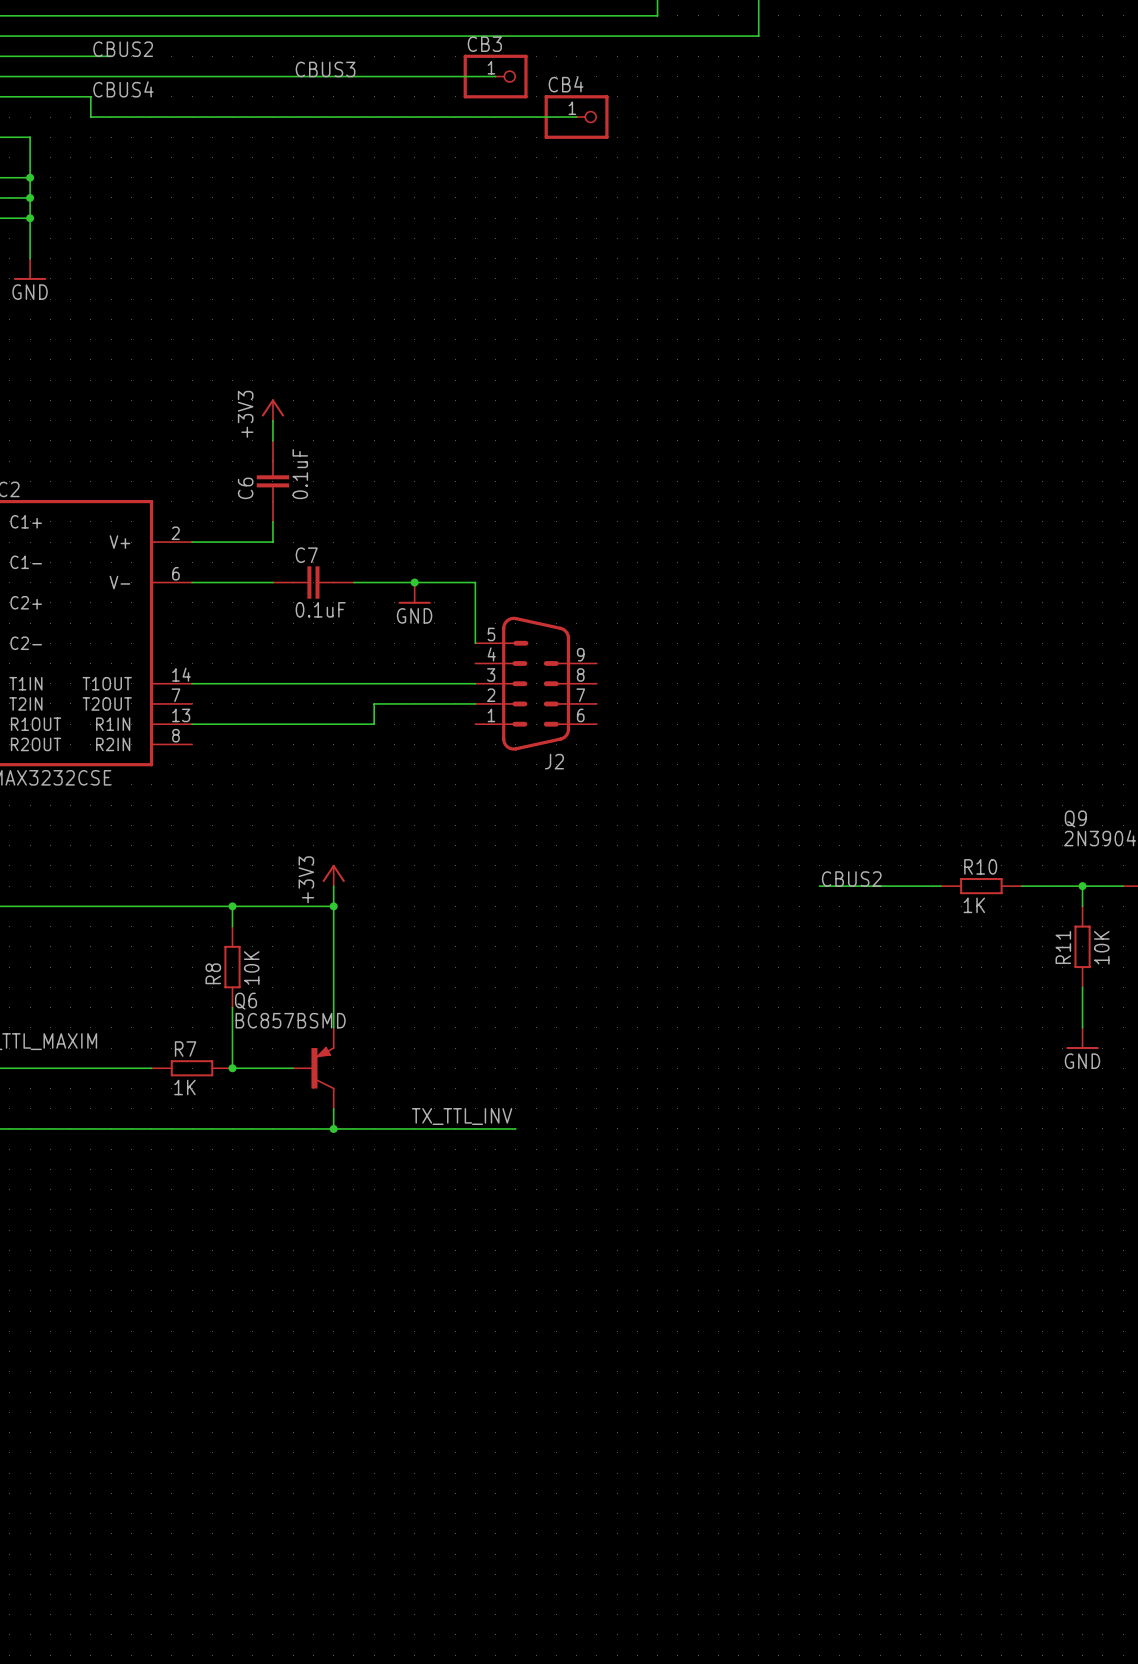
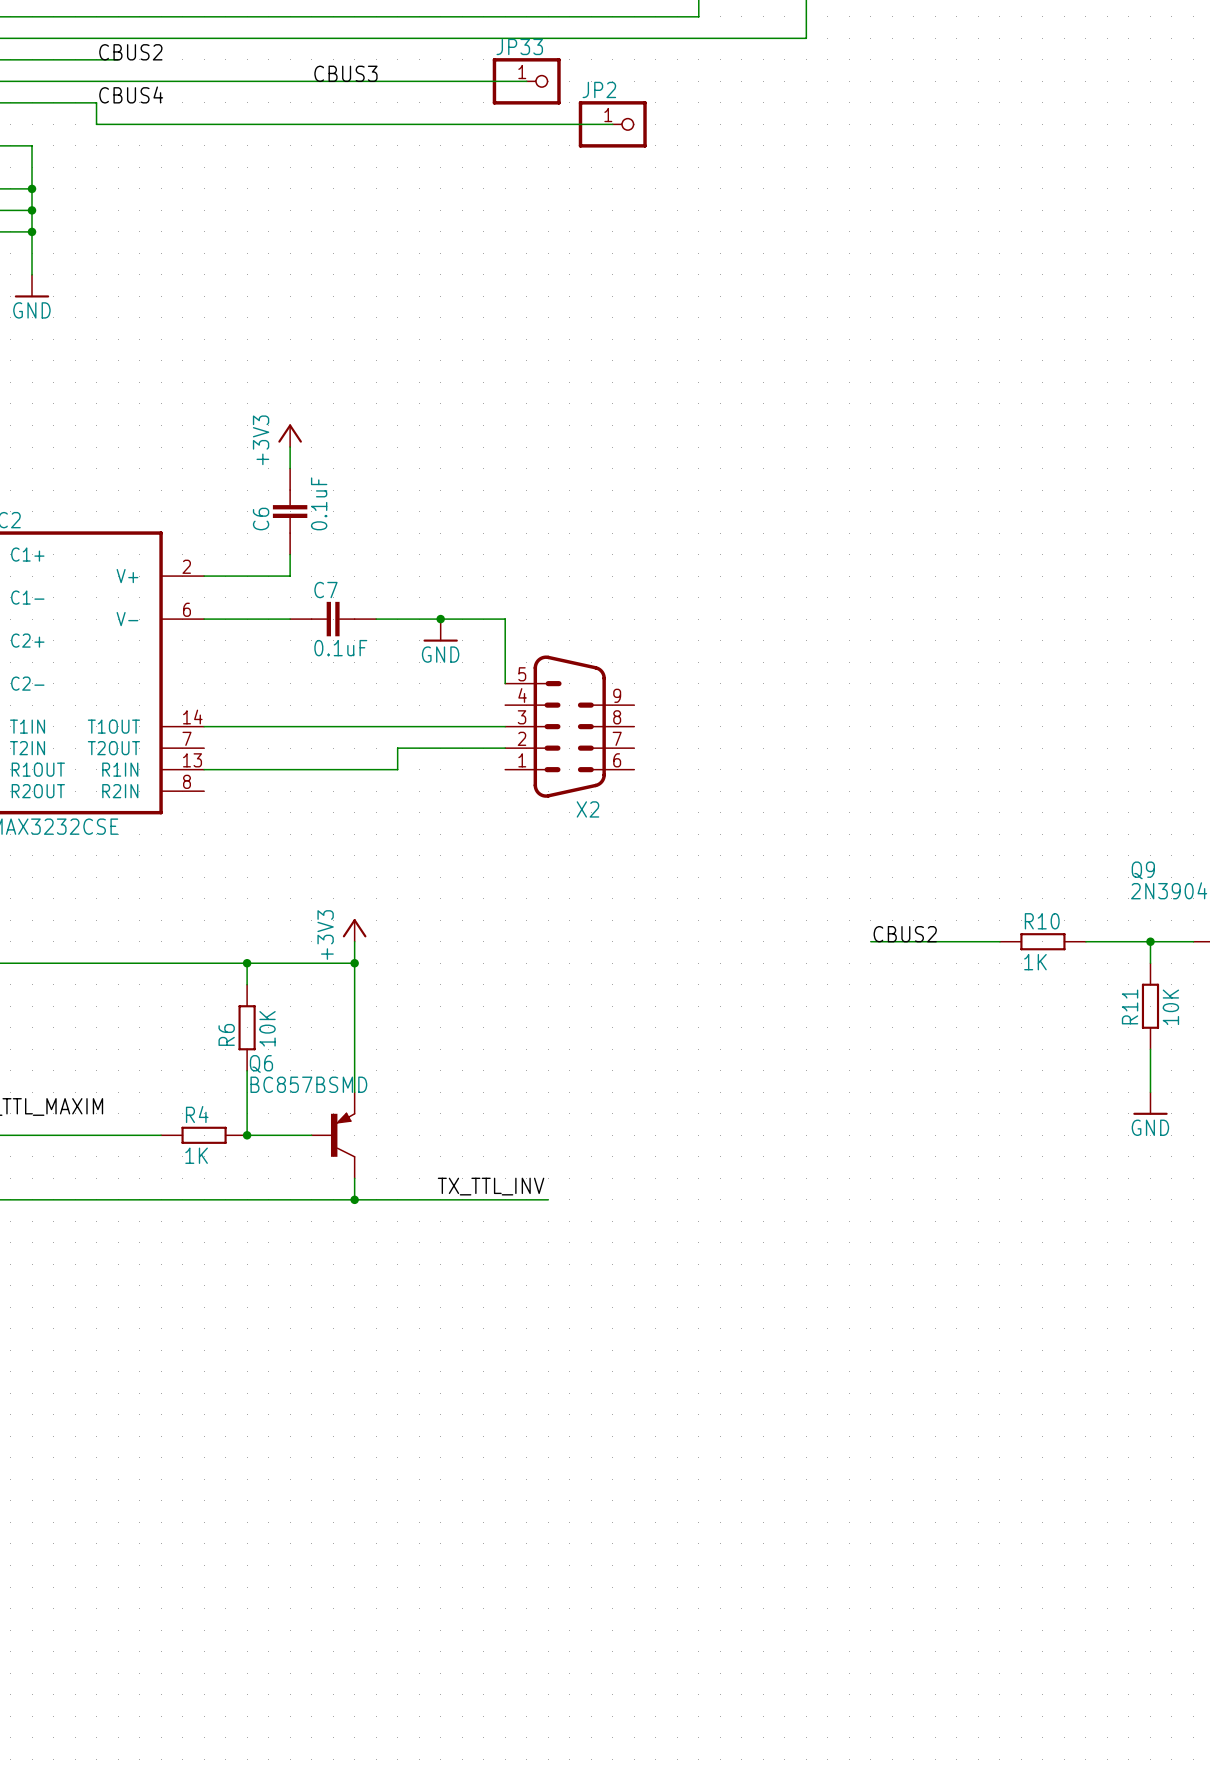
CB3 name: CB3 (484, 44) -> JP33 (519, 46)
CB4 name: CB4 (566, 84) -> JP2 (599, 89)
J2 name: J2 (554, 761) -> X2 (587, 809)
R8 name: R8 (213, 973) -> R6 (226, 1034)
R7 name: R7 (185, 1049) -> R4 (197, 1114)

